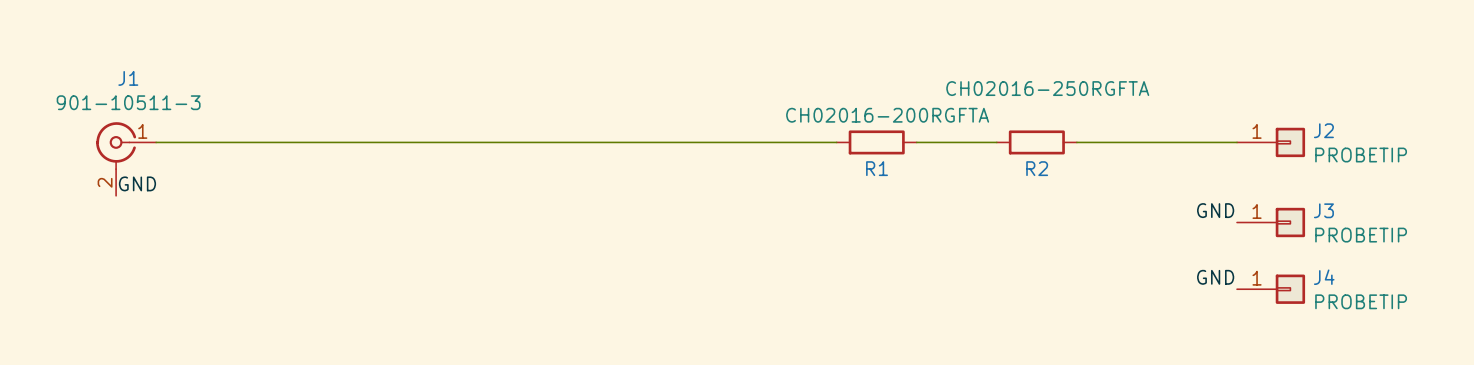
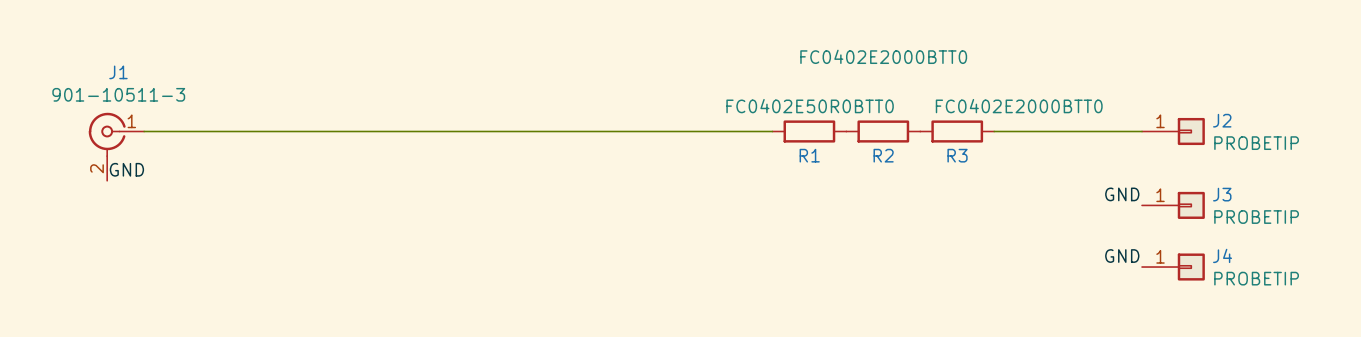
R2 value: CH02016-250RGFTA (1047, 88) -> FC0402E2000BTT0 (1019, 106)
R1 value: CH02016-200RGFTA (887, 115) -> FC0402E50R0BTT0 (810, 106)
wire: (916, 142) (996, 142) -> none
R2: none -> FC0402E2000BTT0 (883, 131)
R2 name: R2 (1037, 168) -> R3 (957, 155)

